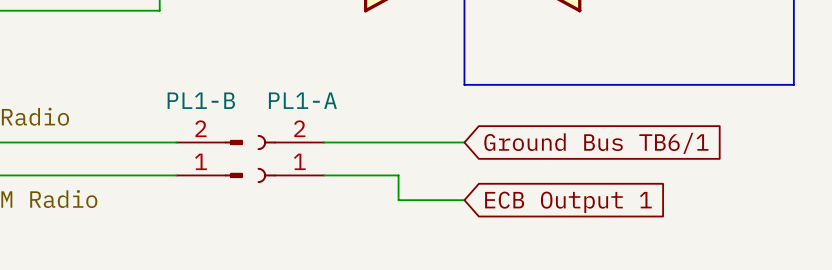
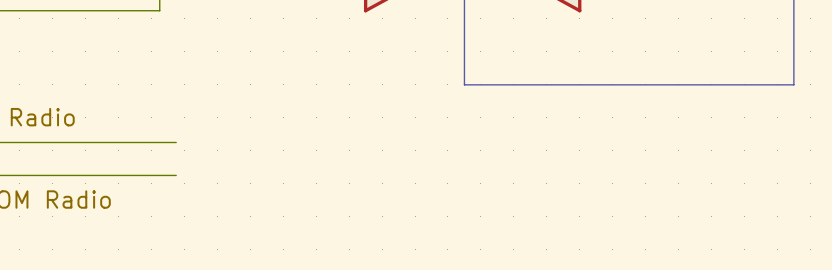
wire: (324, 142) (464, 142) -> none
global label: Ground Bus TB6/1 (596, 143) -> none
part: PL1-A (209, 158) -> none
part: PL1-B (291, 158) -> none
wire: (324, 175) (398, 175) (398, 200) (464, 200) -> none
global label: ECB Output 1 (568, 202) -> none

